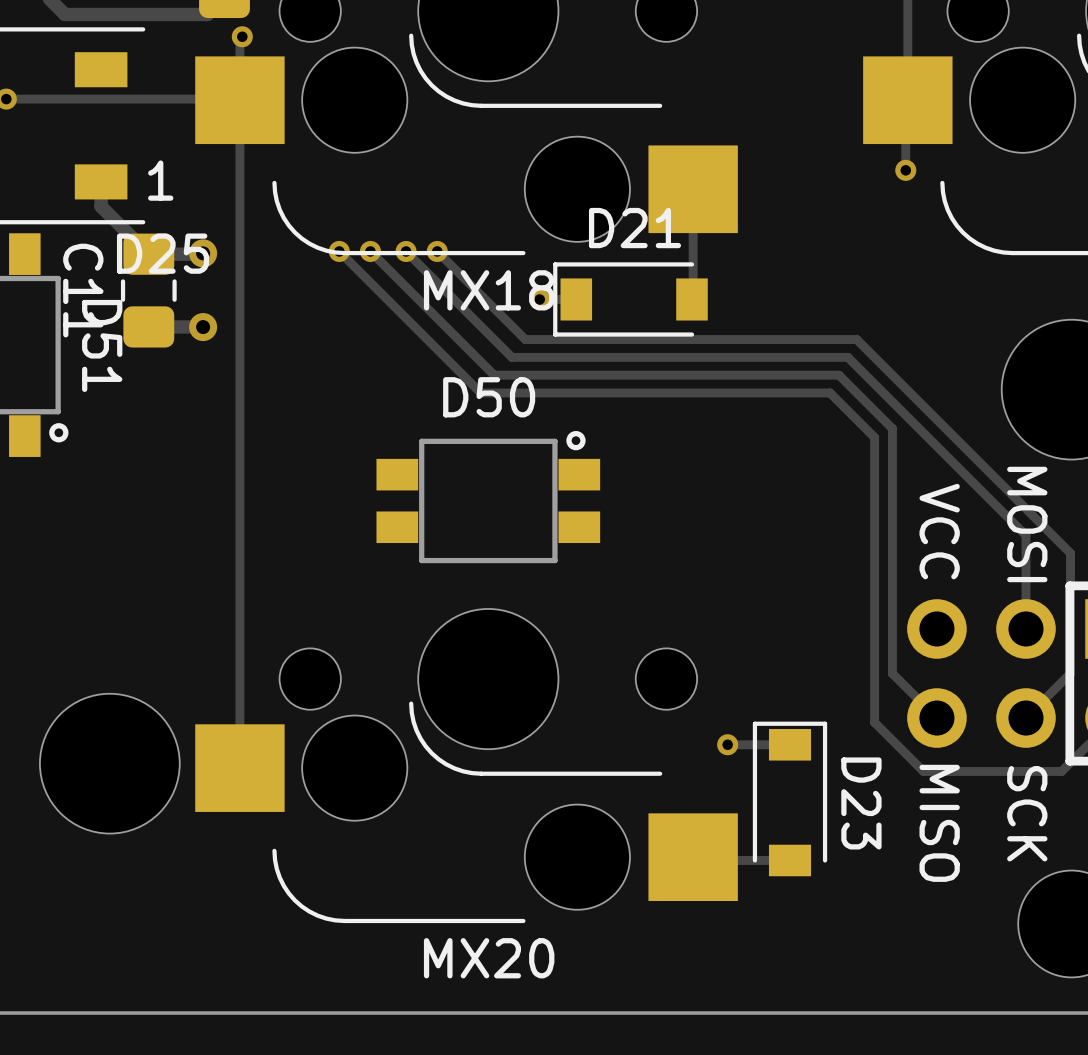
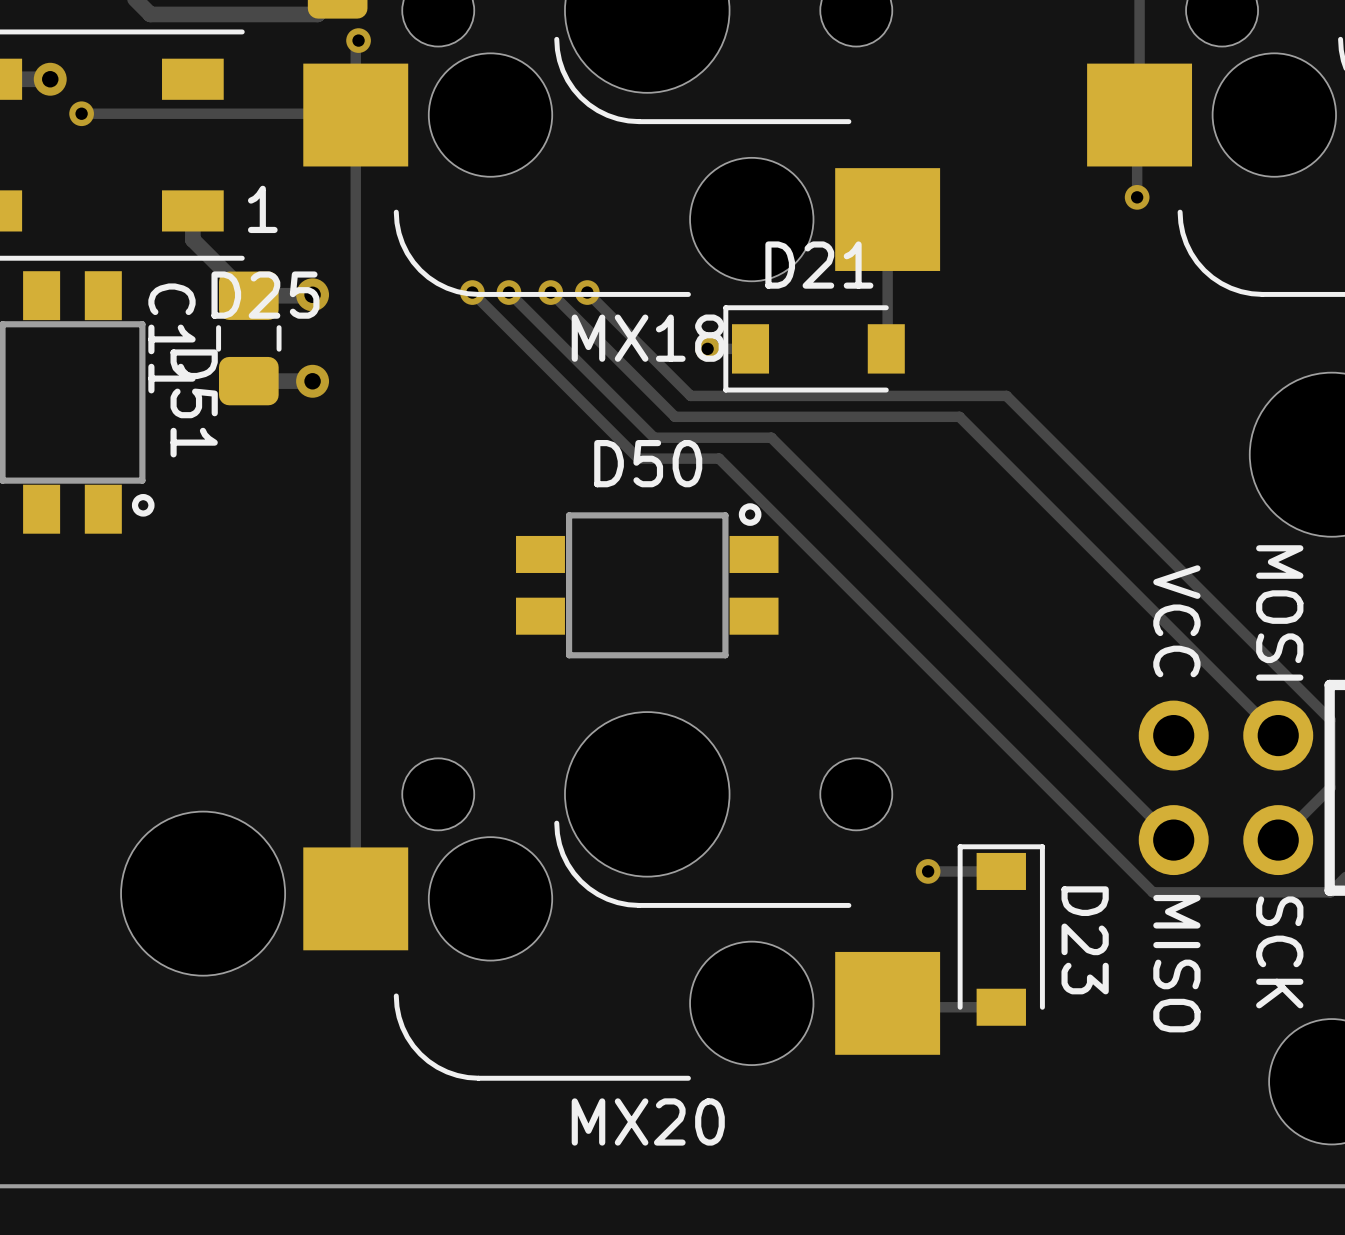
track: (794, 339) (856, 339) (1070, 553) (1070, 615) -> (1006, 395) (1330, 719)
track: (754, 357) (847, 357) (1025, 535) (1025, 628) -> (959, 416) (1278, 735)
track: (594, 375) (838, 375) (892, 428) (892, 673) -> (771, 437) (1121, 787)
track: (549, 392) (830, 392) (874, 437) (874, 722) (923, 771) (1061, 771) (1070, 762) -> (719, 458) (1152, 892) (1330, 892)

